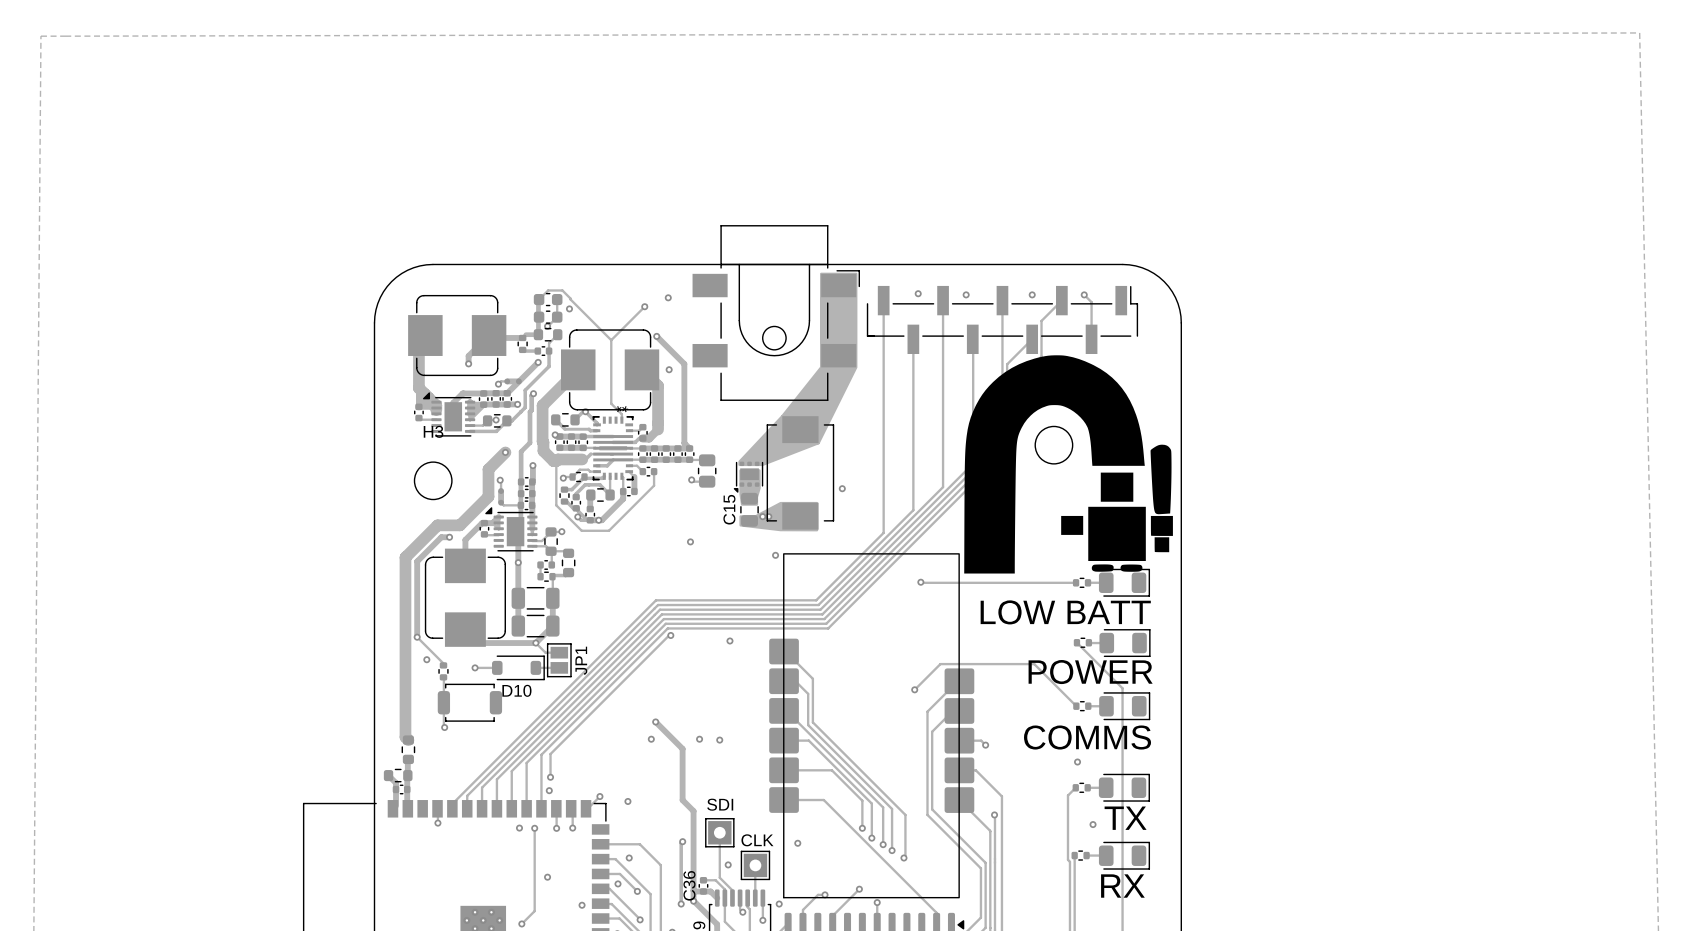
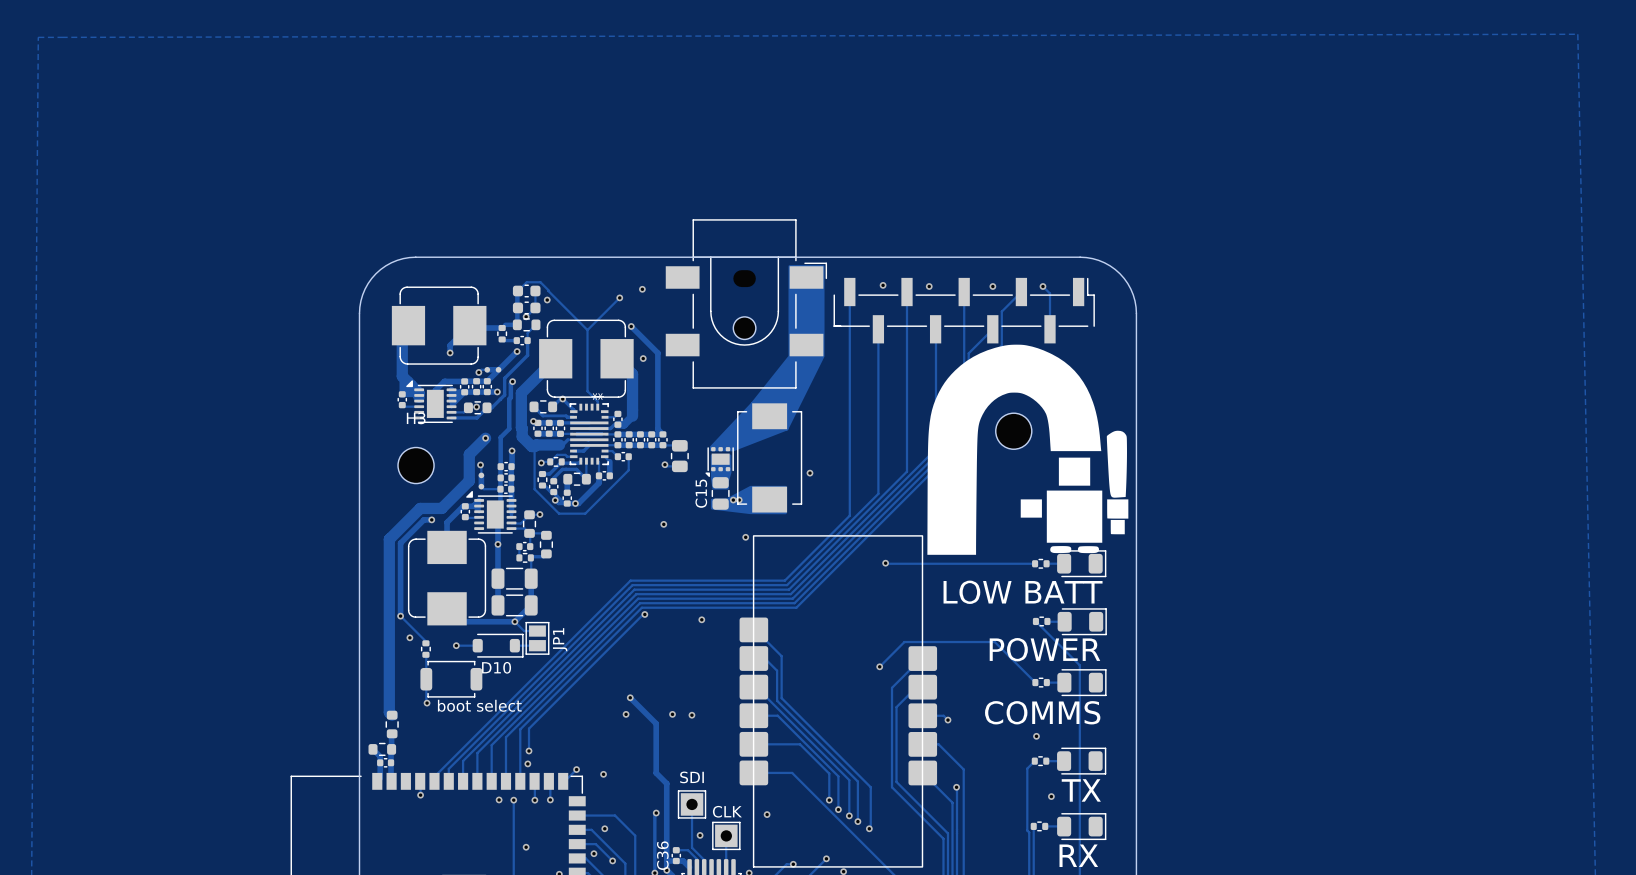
text: none -> boot select (479, 705)

